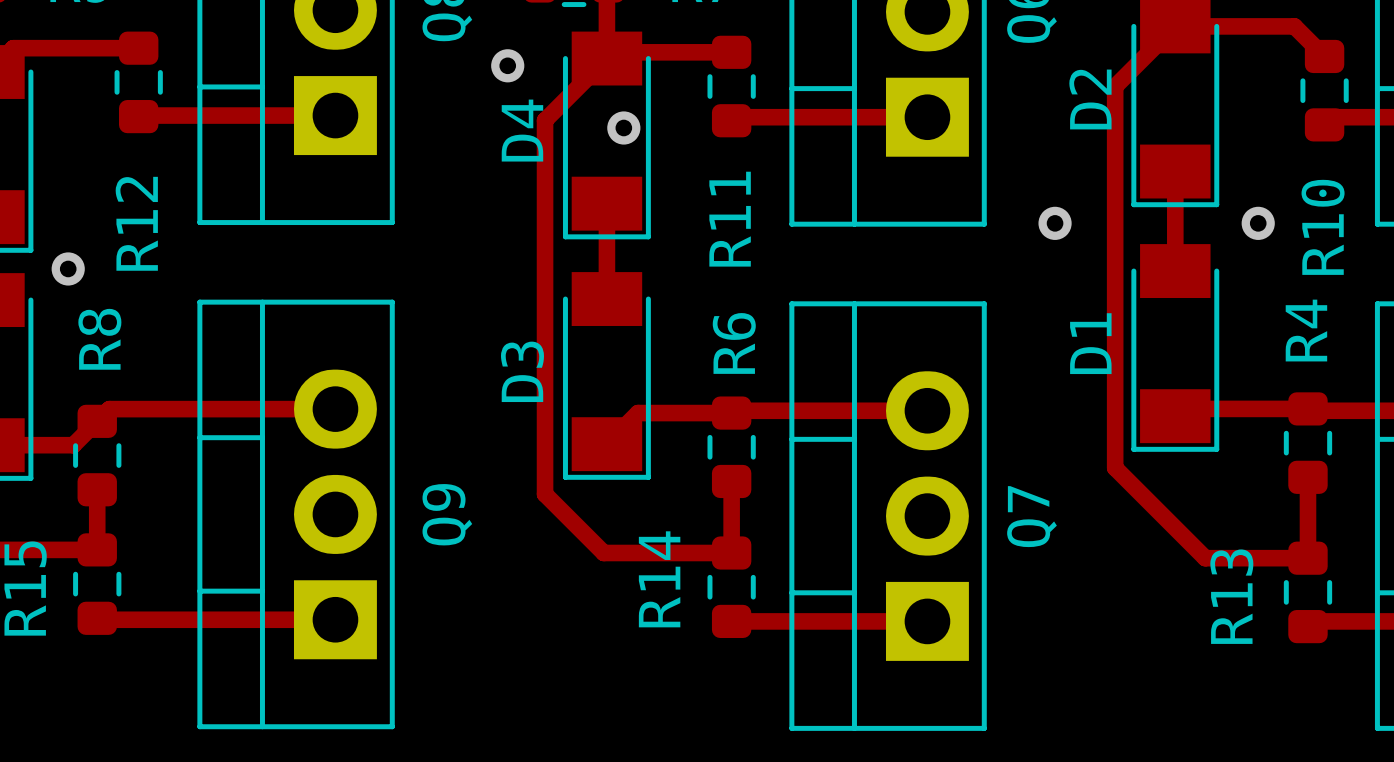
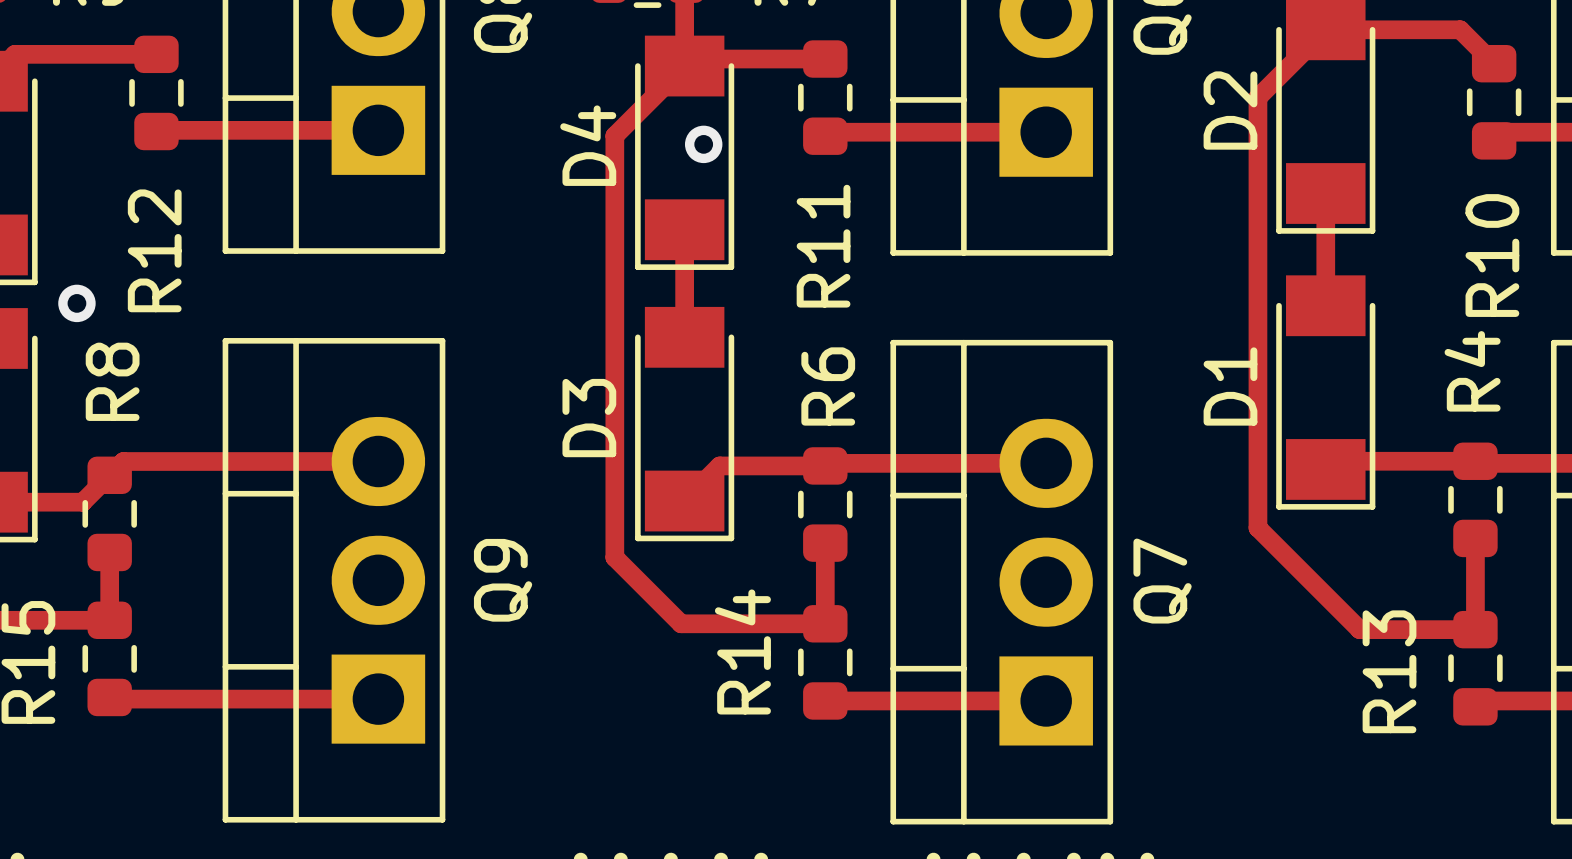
via: (507, 65) -> none
via: (1055, 223) -> none
via: (1258, 223) -> none

